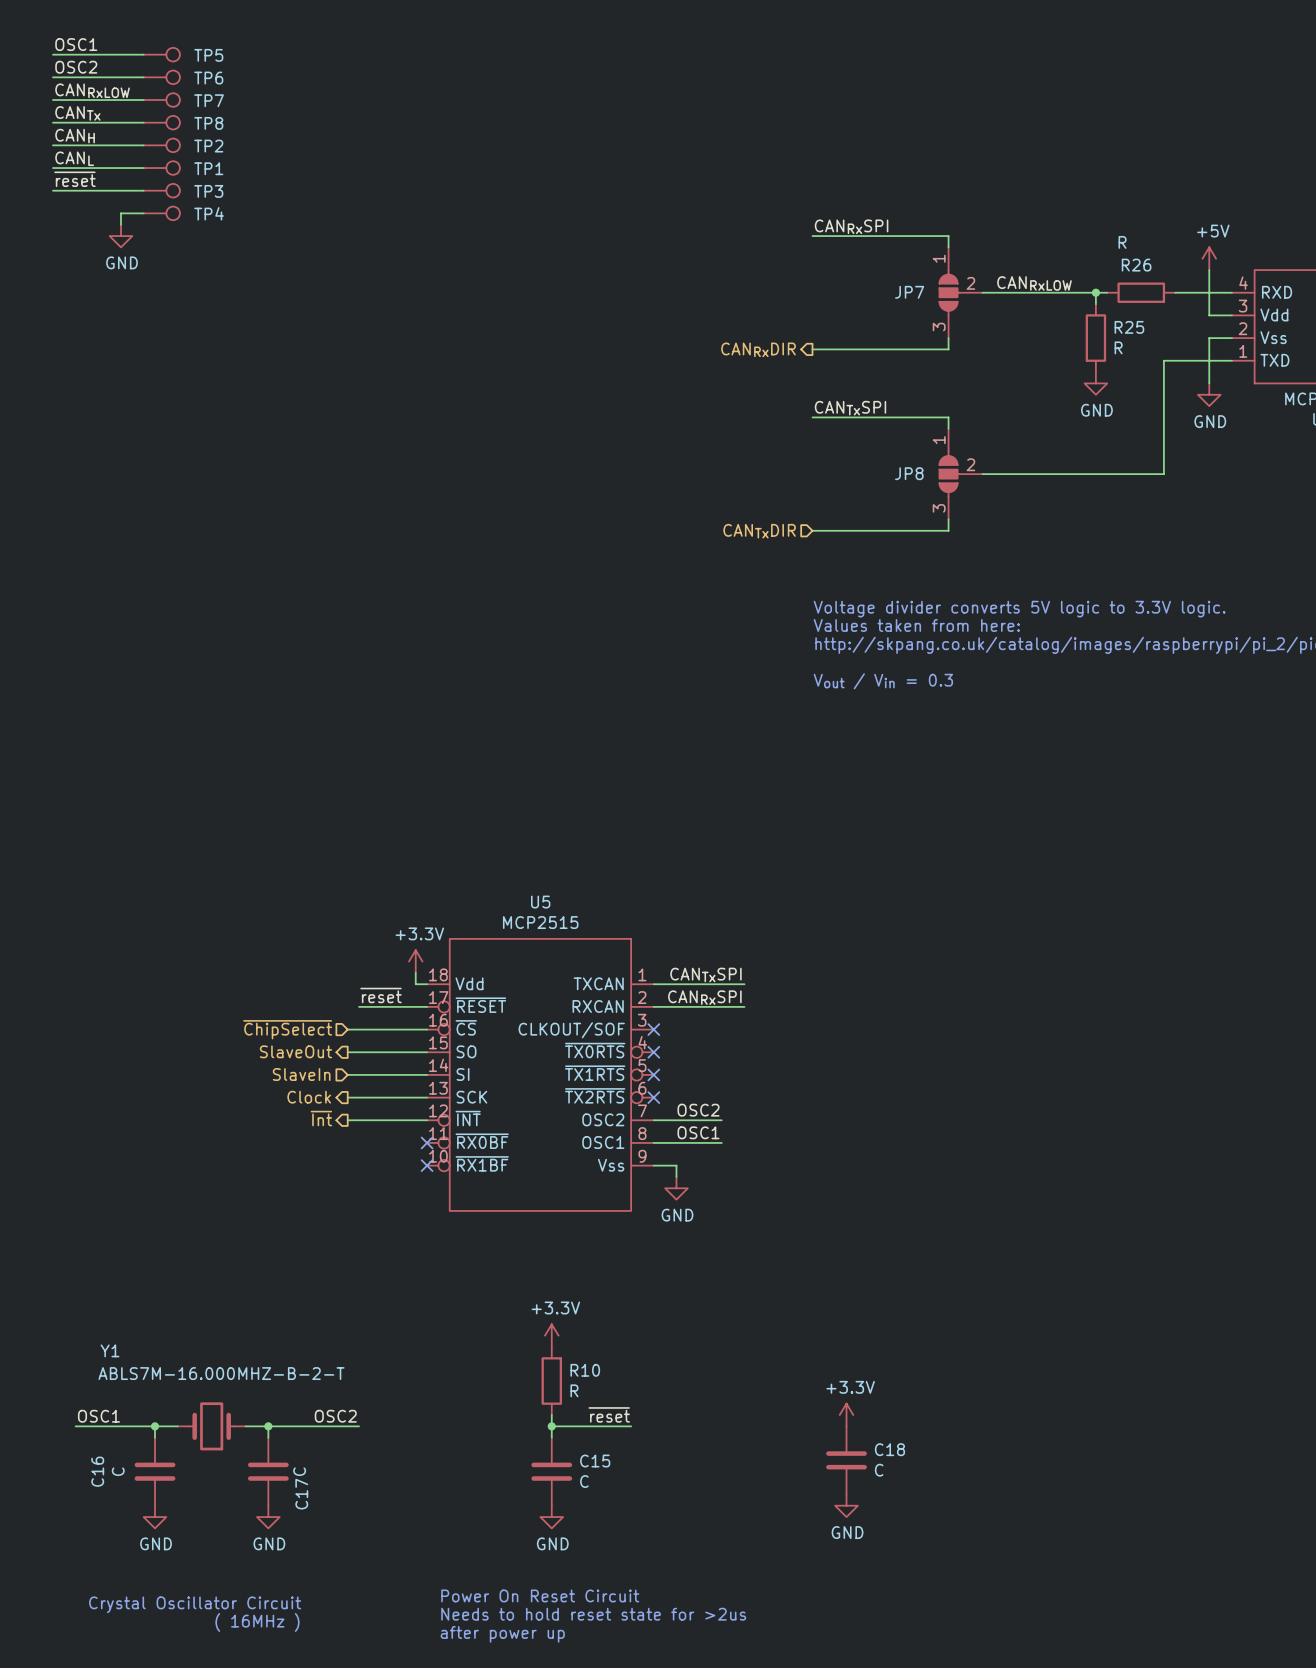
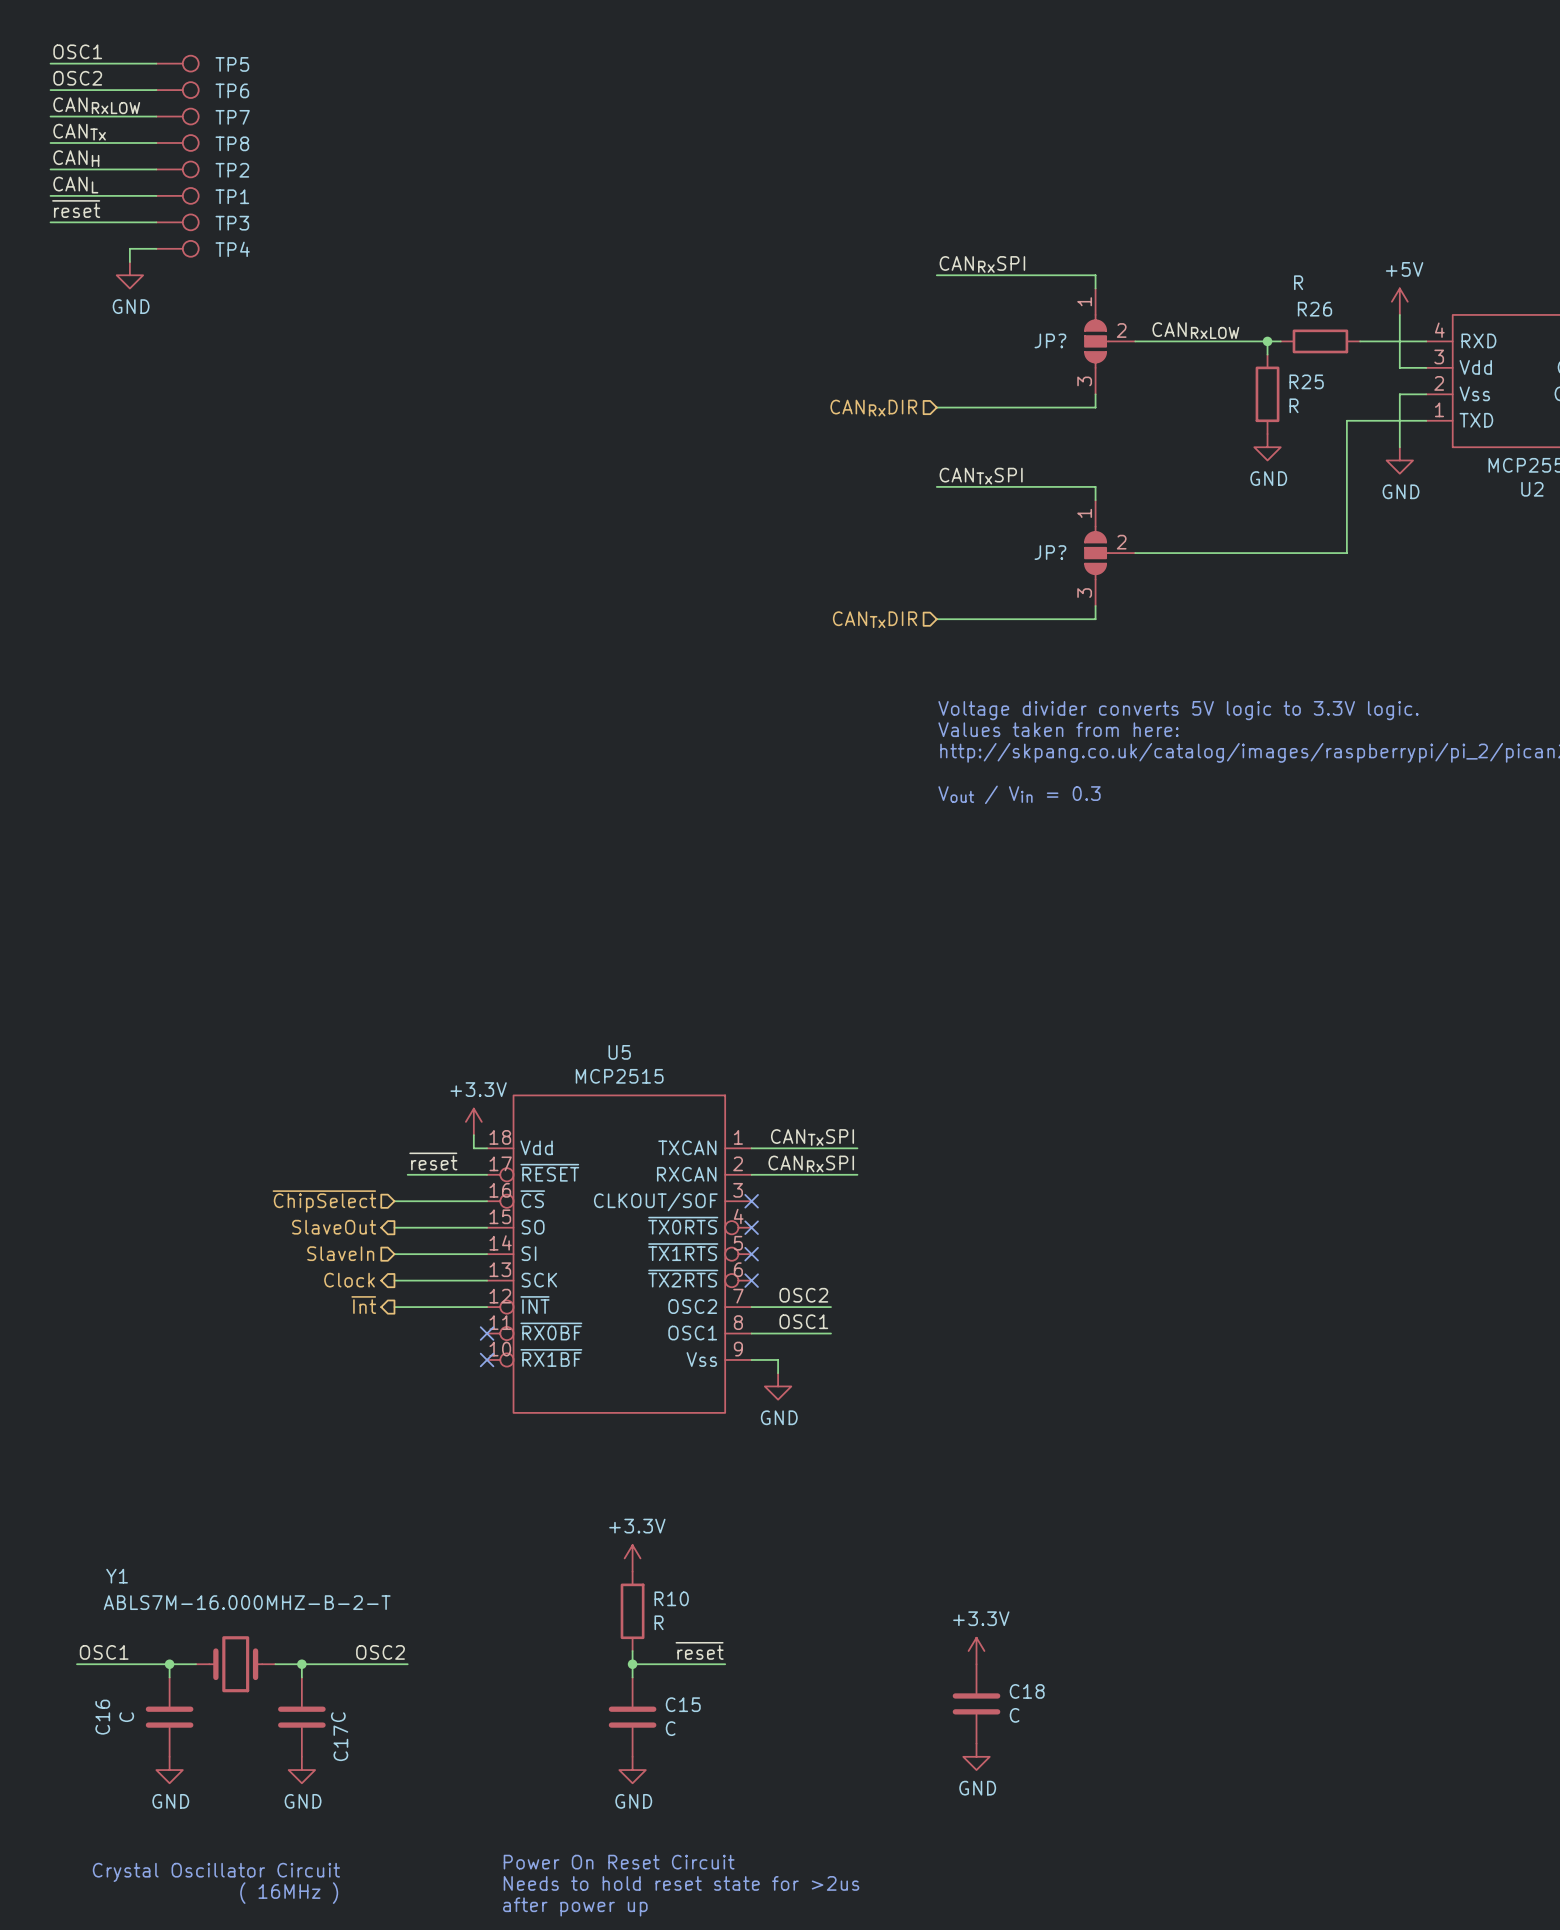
JP7 name: JP7 (909, 292) -> JP? (1050, 340)
hierarchical label shape: output (758, 349) -> input (873, 408)
JP8 name: JP8 (909, 473) -> JP? (1050, 552)

